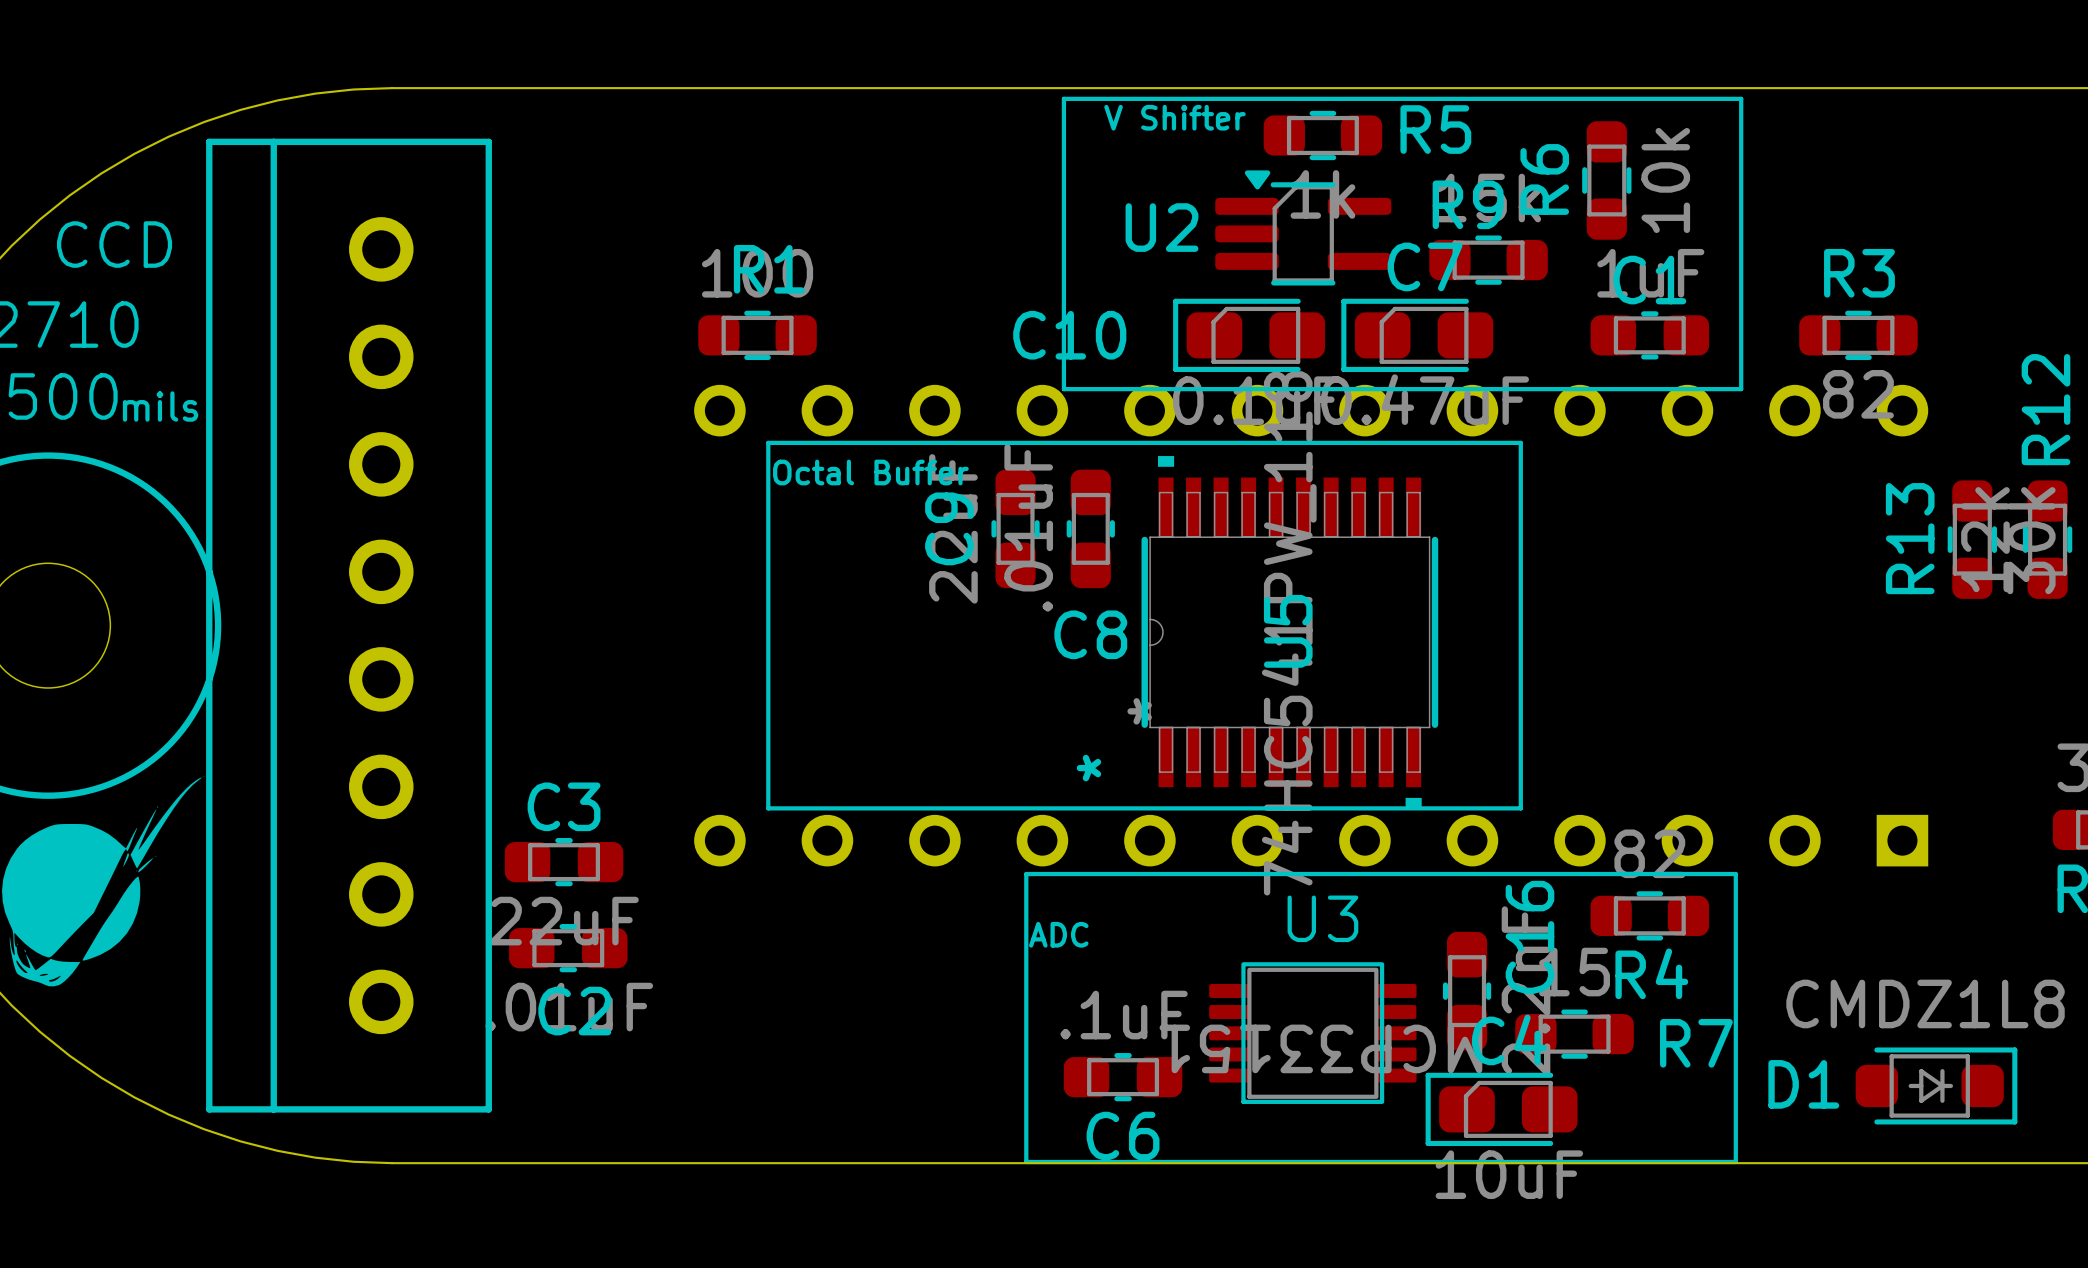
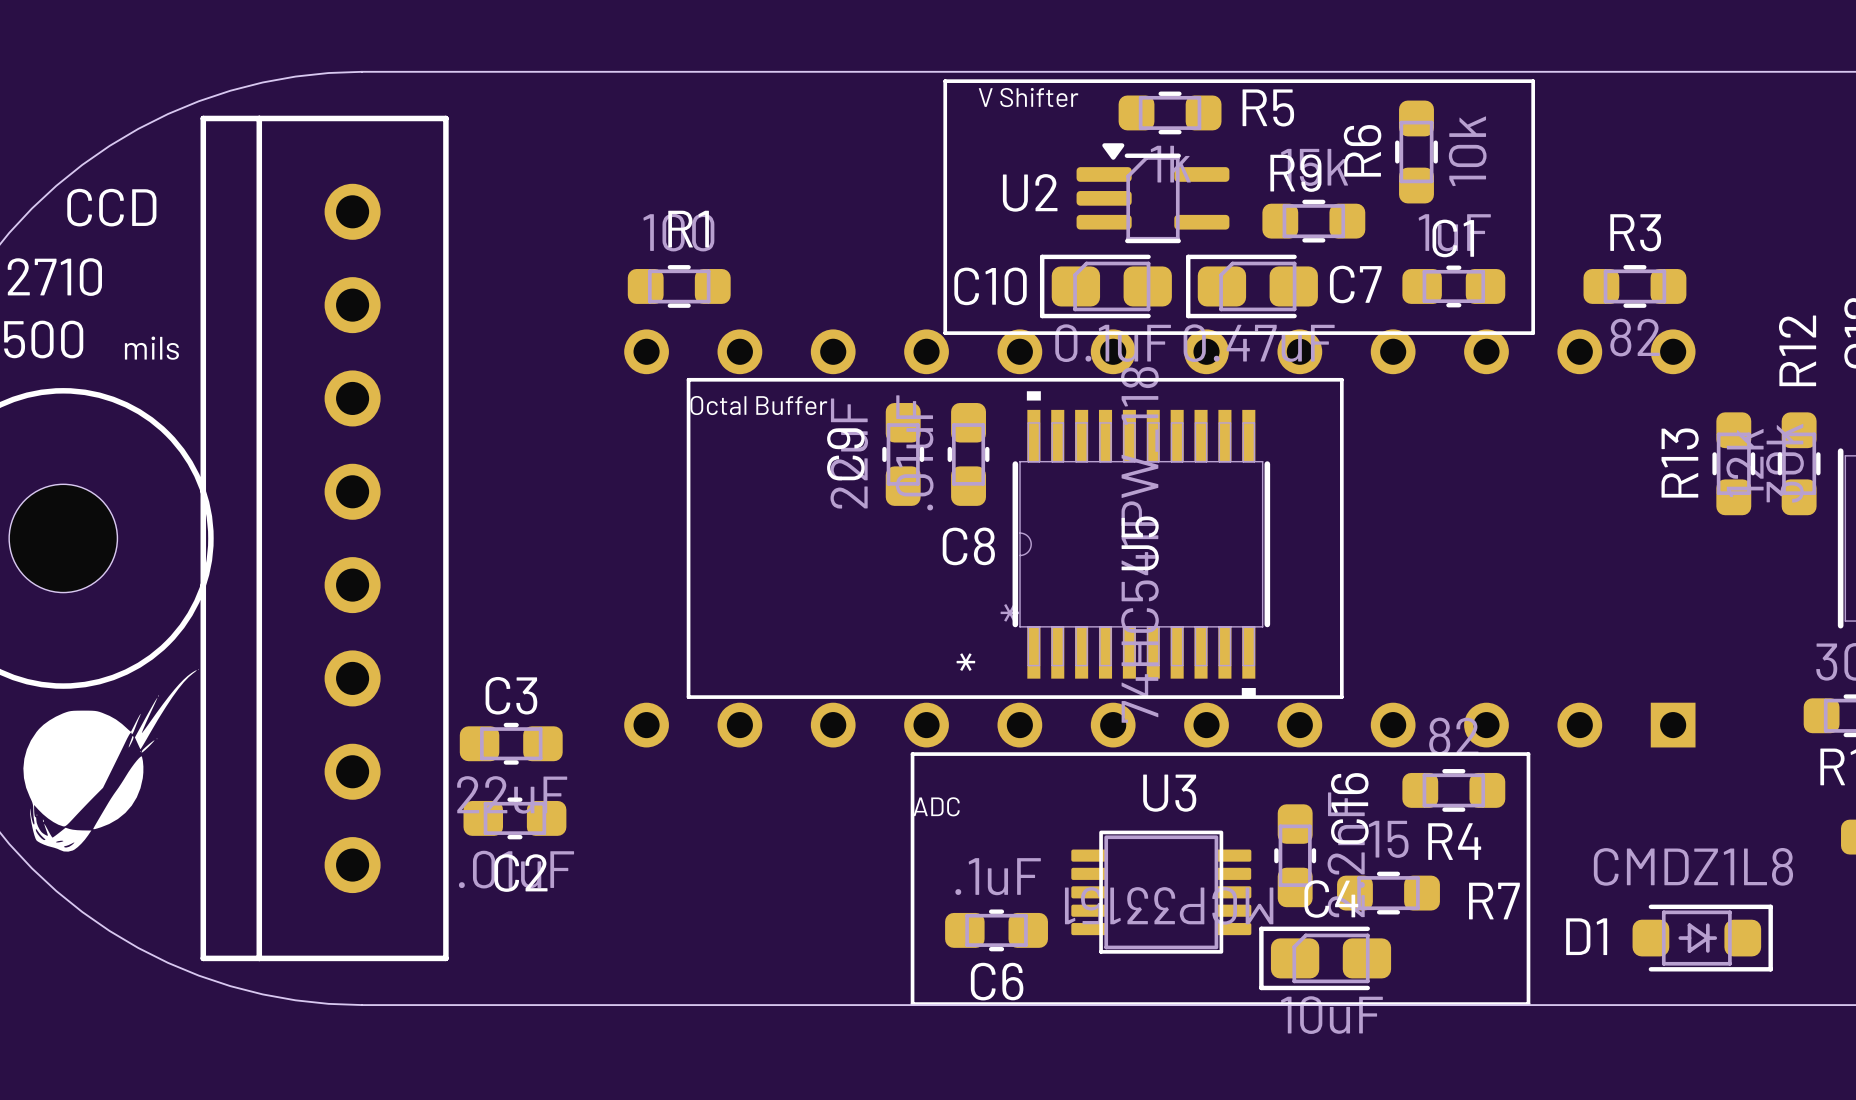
C7 name position: C7 (1425, 266) -> C7 (1355, 284)
C10 name position: C10 (1069, 335) -> C10 (990, 286)

